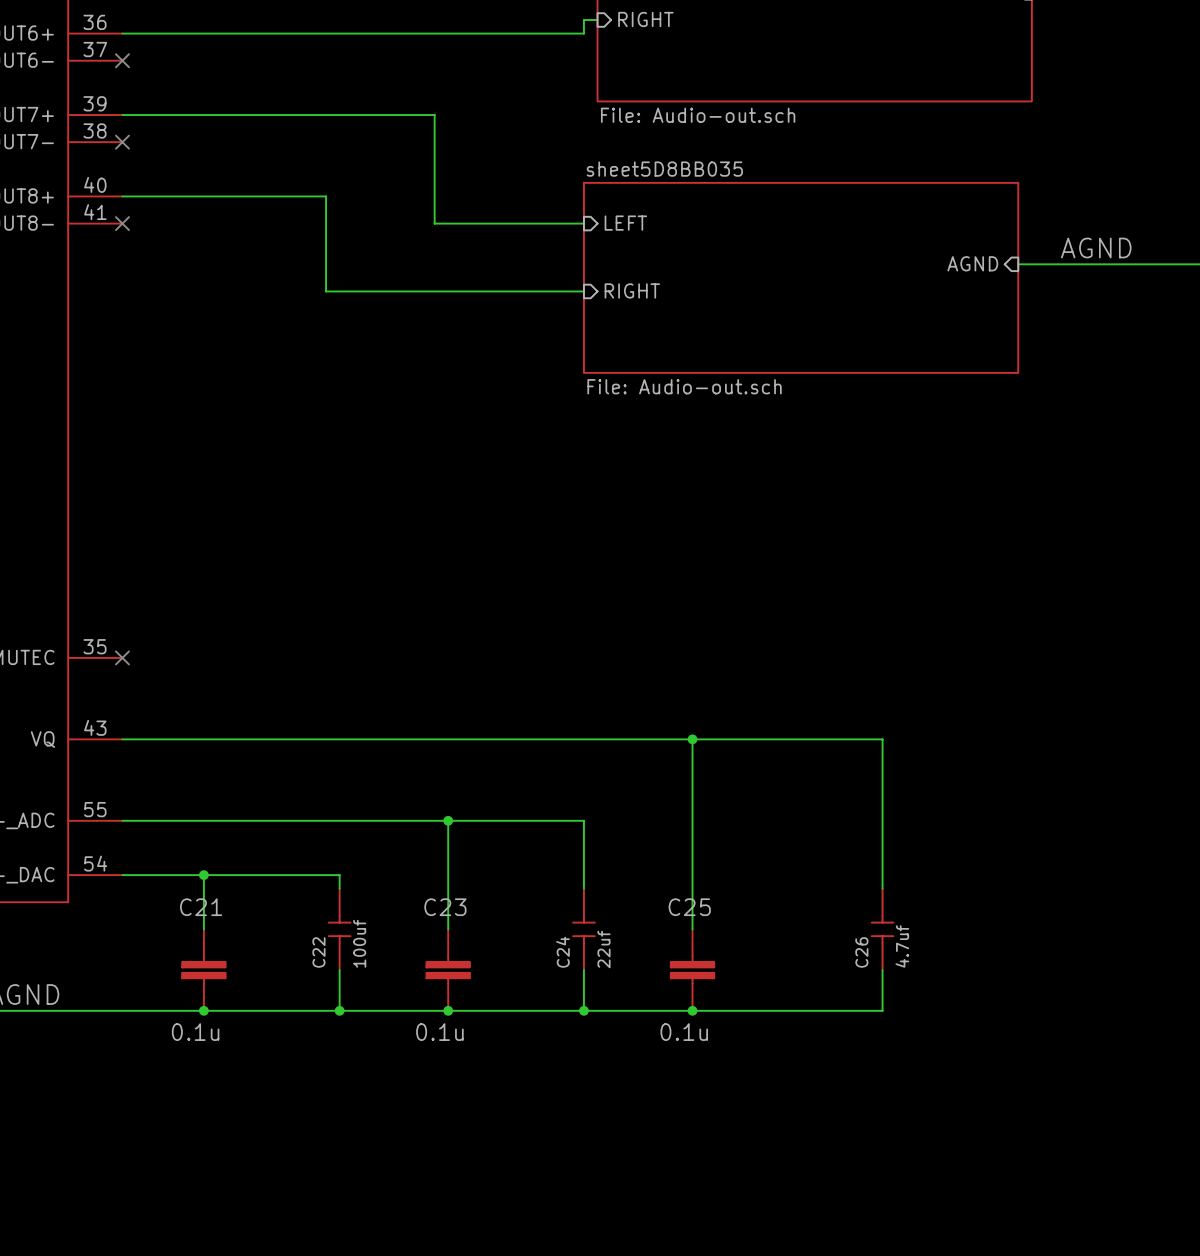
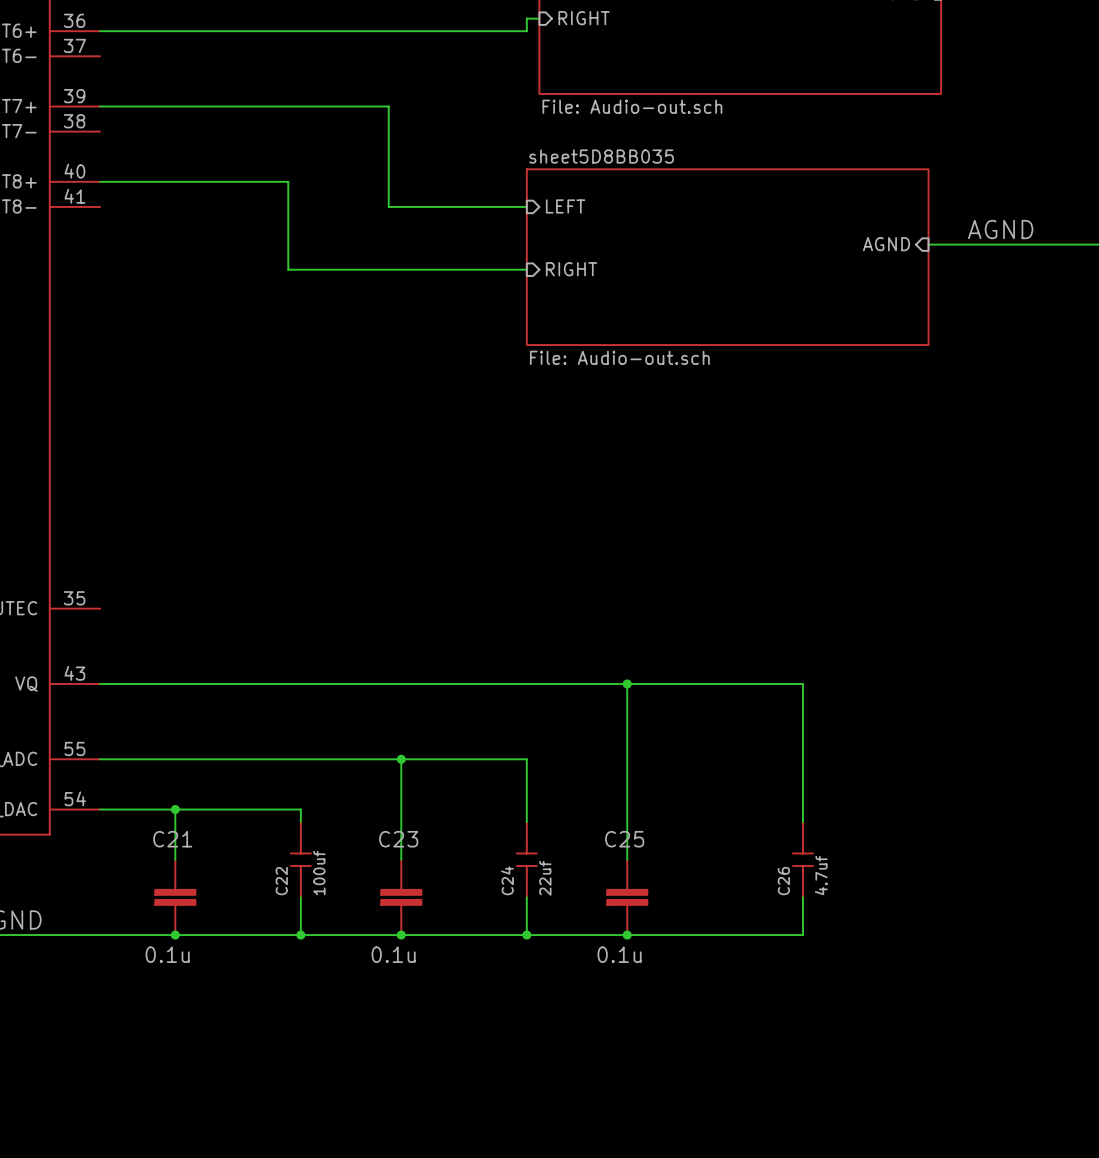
no-connect mark: (122, 60) -> none
no-connect mark: (122, 142) -> none
no-connect mark: (122, 223) -> none
no-connect mark: (122, 657) -> none

